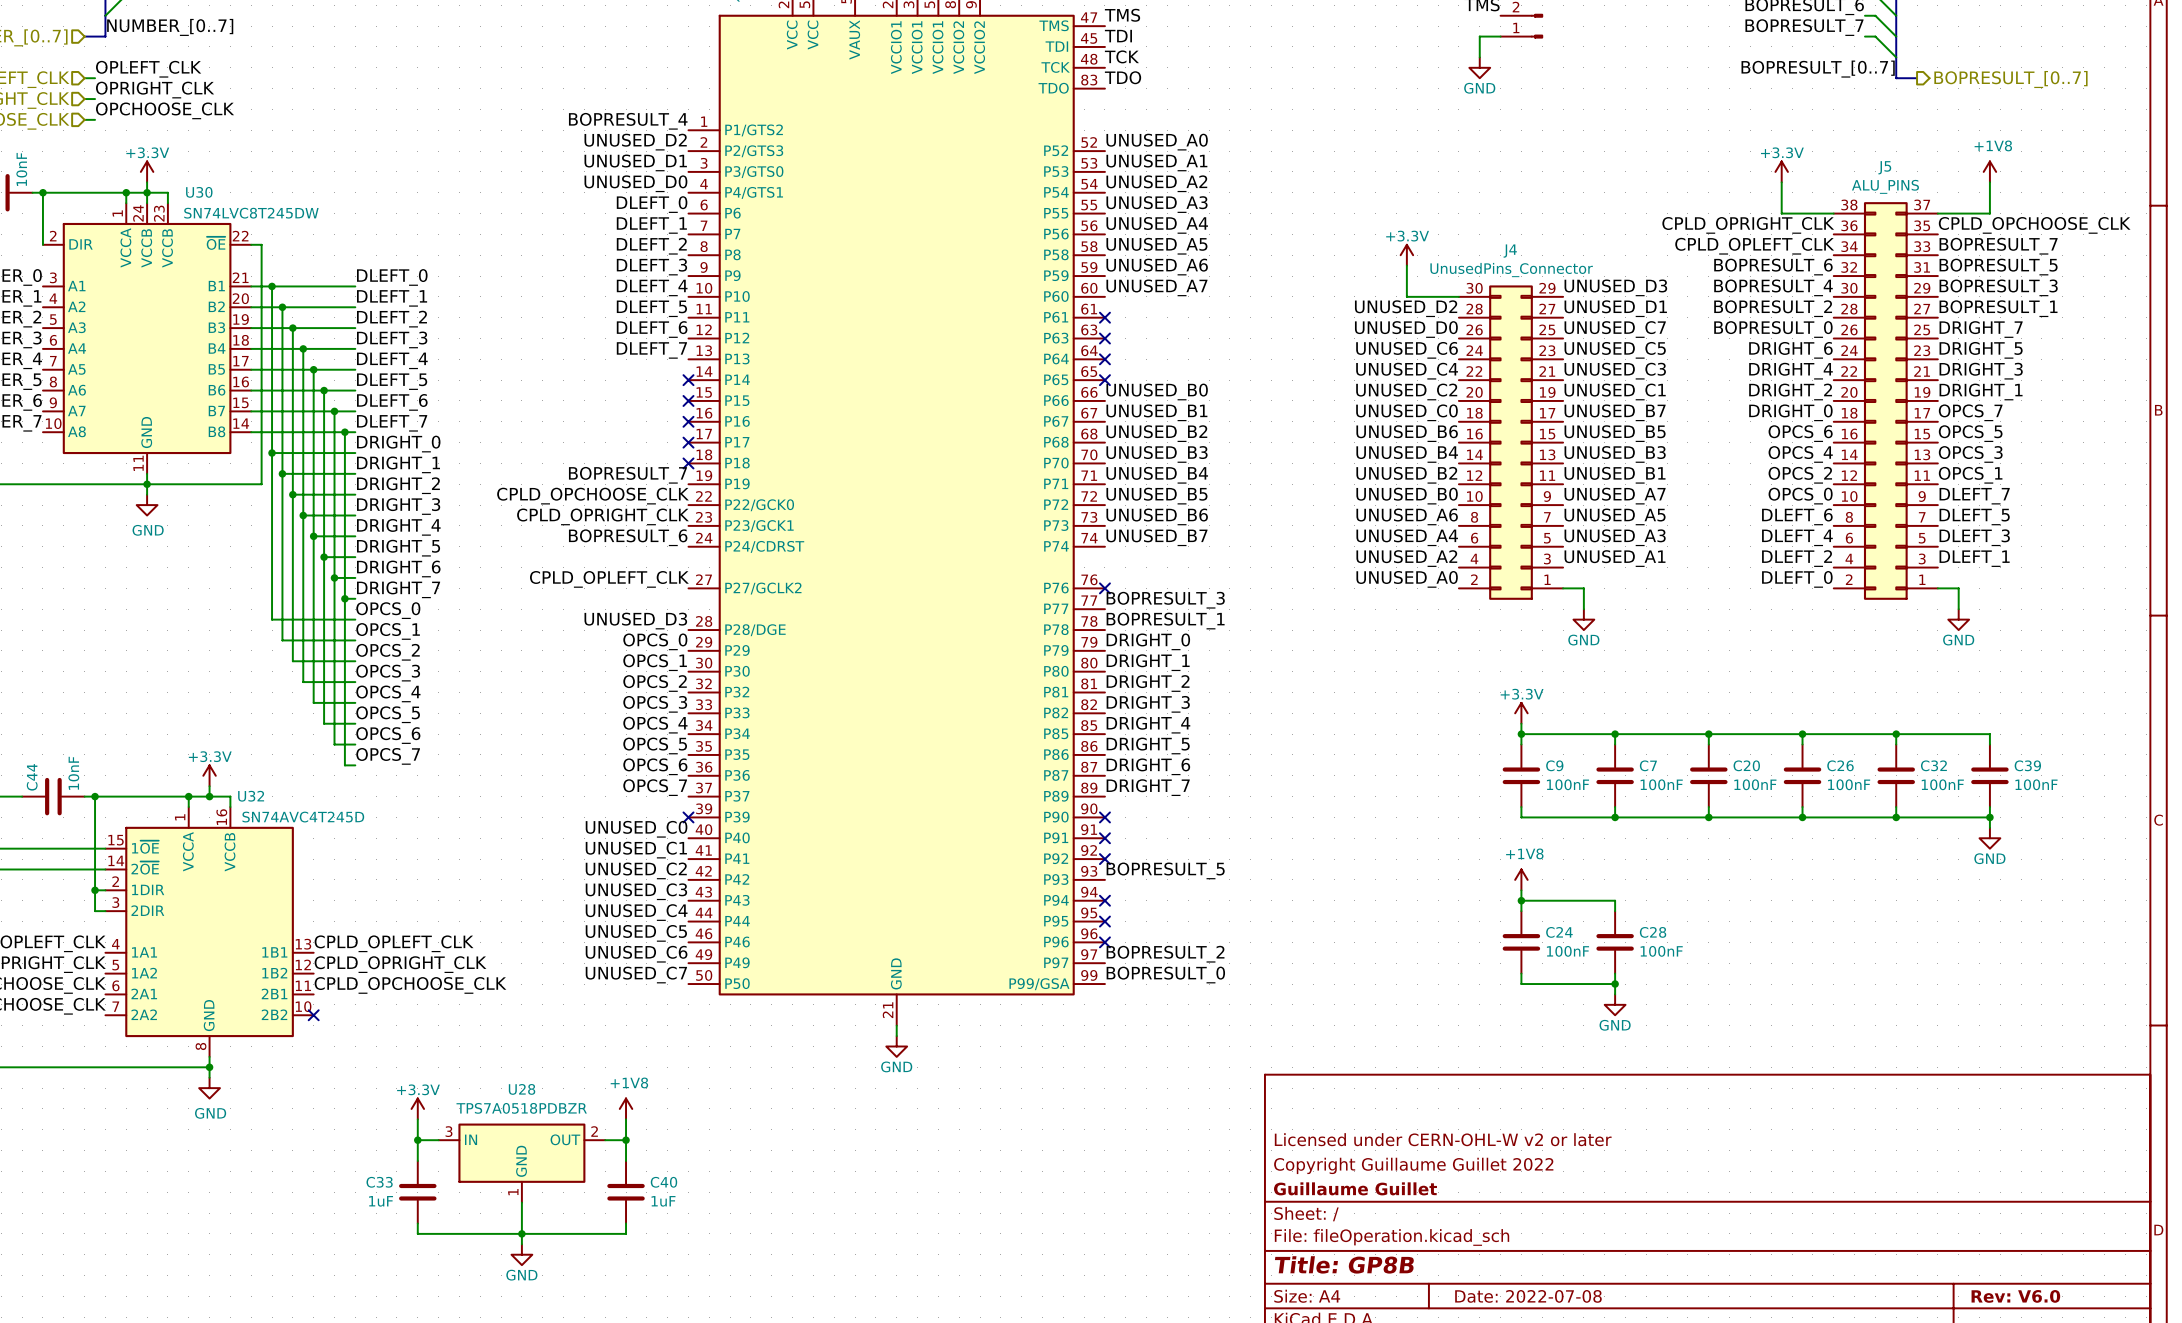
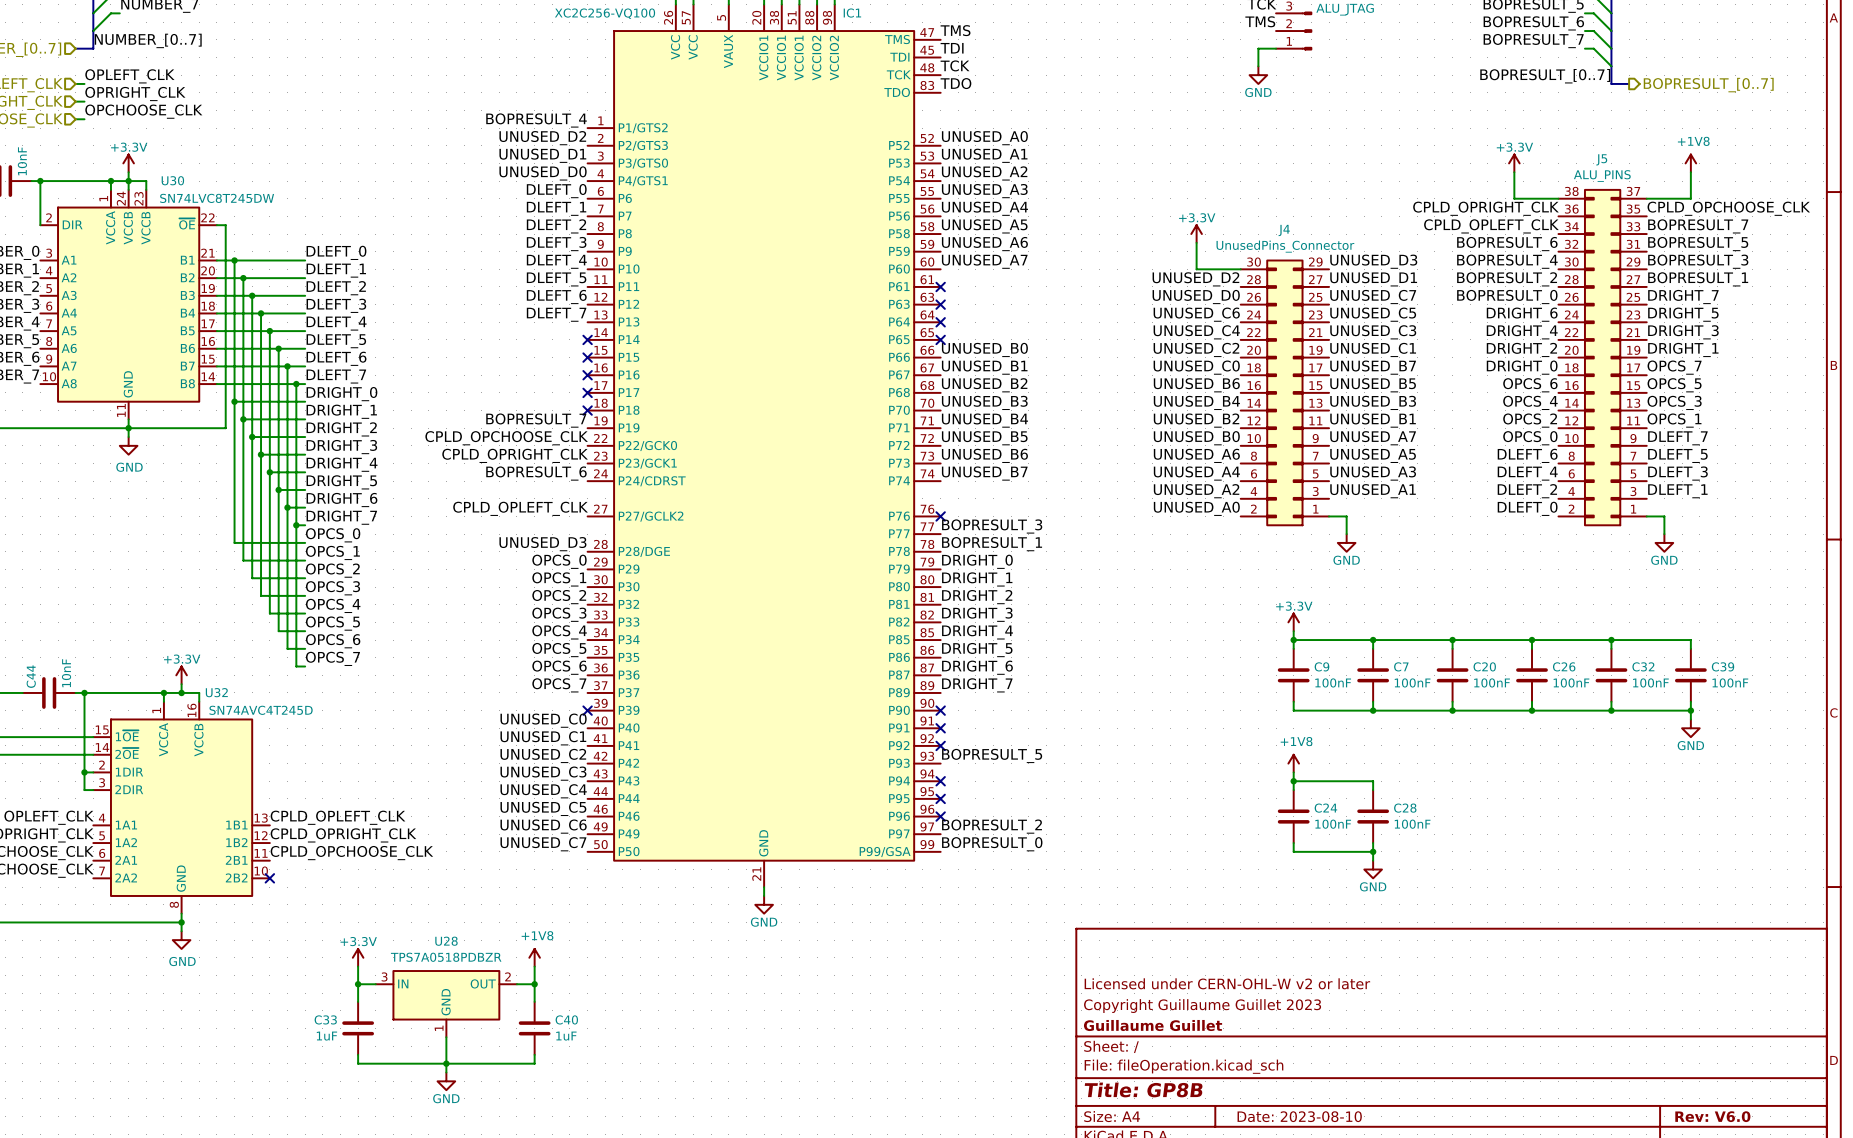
title block: Copyright Guillaume Guillet 2022 (1413, 1165) -> Copyright Guillaume Guillet 2023 (1202, 1006)
title block: Date: 2022-07-08 (1528, 1296) -> Date: 2023-08-10 (1299, 1116)

